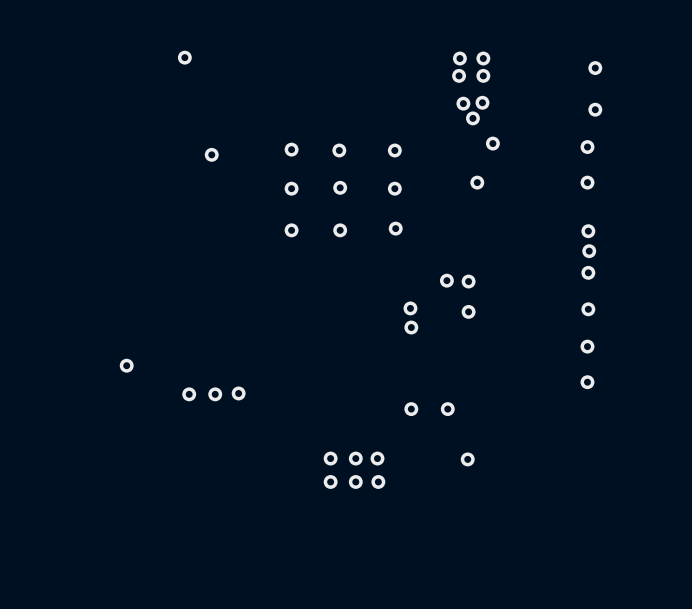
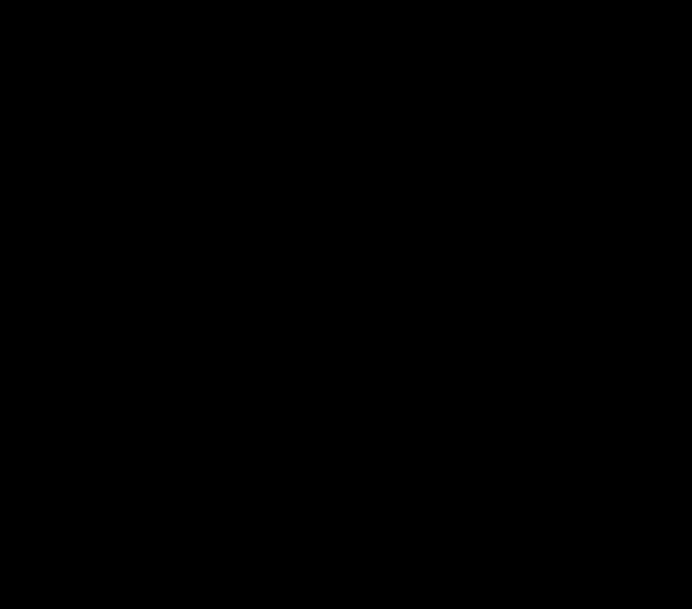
via: (184, 57) -> none
via: (459, 58) -> none
via: (483, 58) -> none
via: (595, 68) -> none
via: (459, 75) -> none
via: (483, 75) -> none
via: (482, 102) -> none
via: (463, 103) -> none
via: (595, 109) -> none
via: (472, 118) -> none
via: (492, 143) -> none
via: (587, 147) -> none
via: (291, 149) -> none
via: (339, 150) -> none
via: (394, 150) -> none
via: (211, 154) -> none
via: (477, 182) -> none
via: (587, 182) -> none
via: (340, 187) -> none
via: (291, 188) -> none
via: (394, 188) -> none
via: (395, 228) -> none
via: (291, 230) -> none
via: (340, 230) -> none
via: (588, 231) -> none
via: (589, 251) -> none
via: (588, 272) -> none
via: (446, 280) -> none
via: (468, 281) -> none
via: (410, 308) -> none
via: (588, 309) -> none
via: (468, 311) -> none
via: (411, 327) -> none
via: (587, 346) -> none
via: (126, 365) -> none
via: (587, 382) -> none
via: (238, 393) -> none
via: (189, 394) -> none
via: (215, 394) -> none
via: (411, 409) -> none
via: (447, 409) -> none
via: (330, 458) -> none
via: (355, 458) -> none
via: (377, 458) -> none
via: (467, 459) -> none
via: (330, 481) -> none
via: (355, 481) -> none
via: (378, 481) -> none

